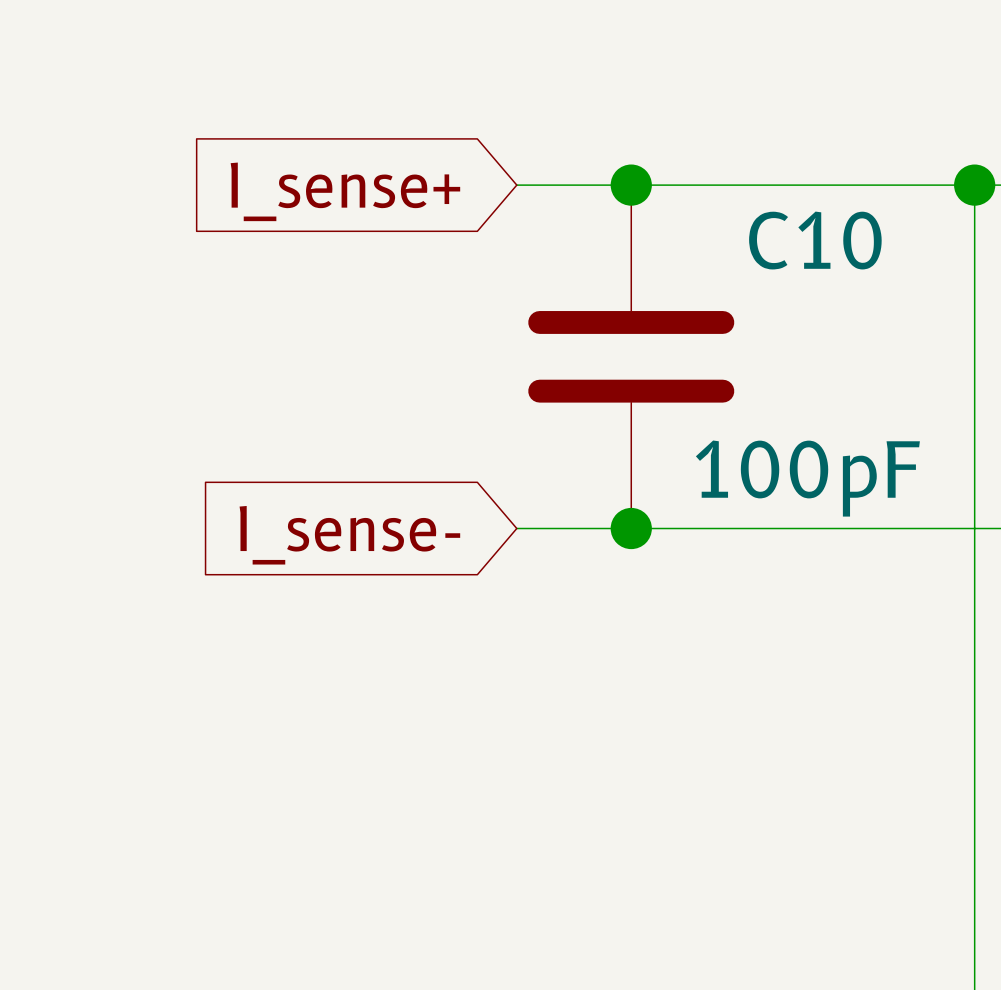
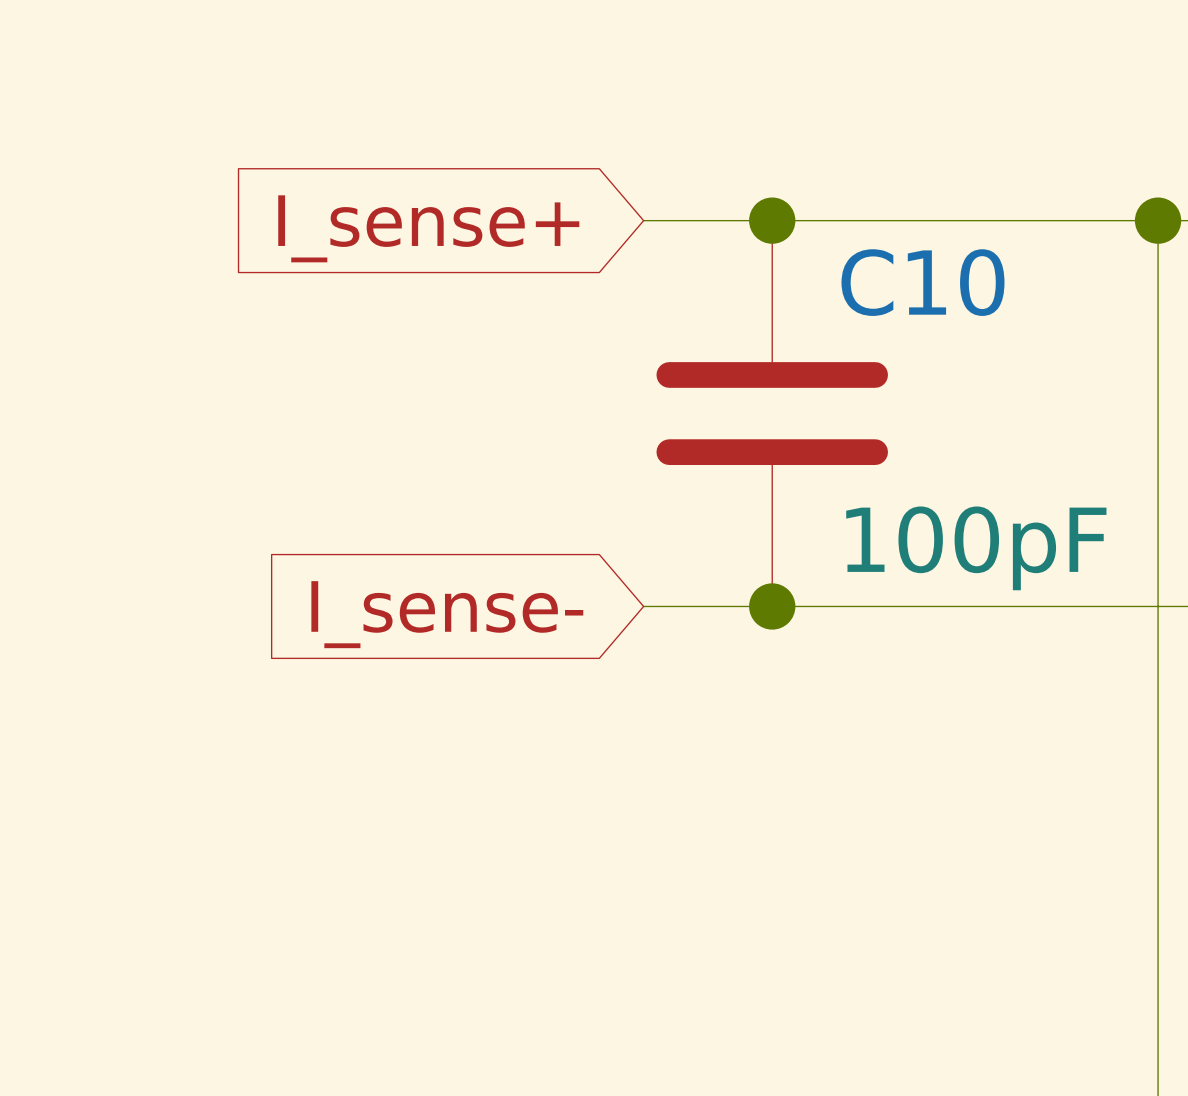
C10 name position: C10 (815, 240) -> C10 (922, 282)

